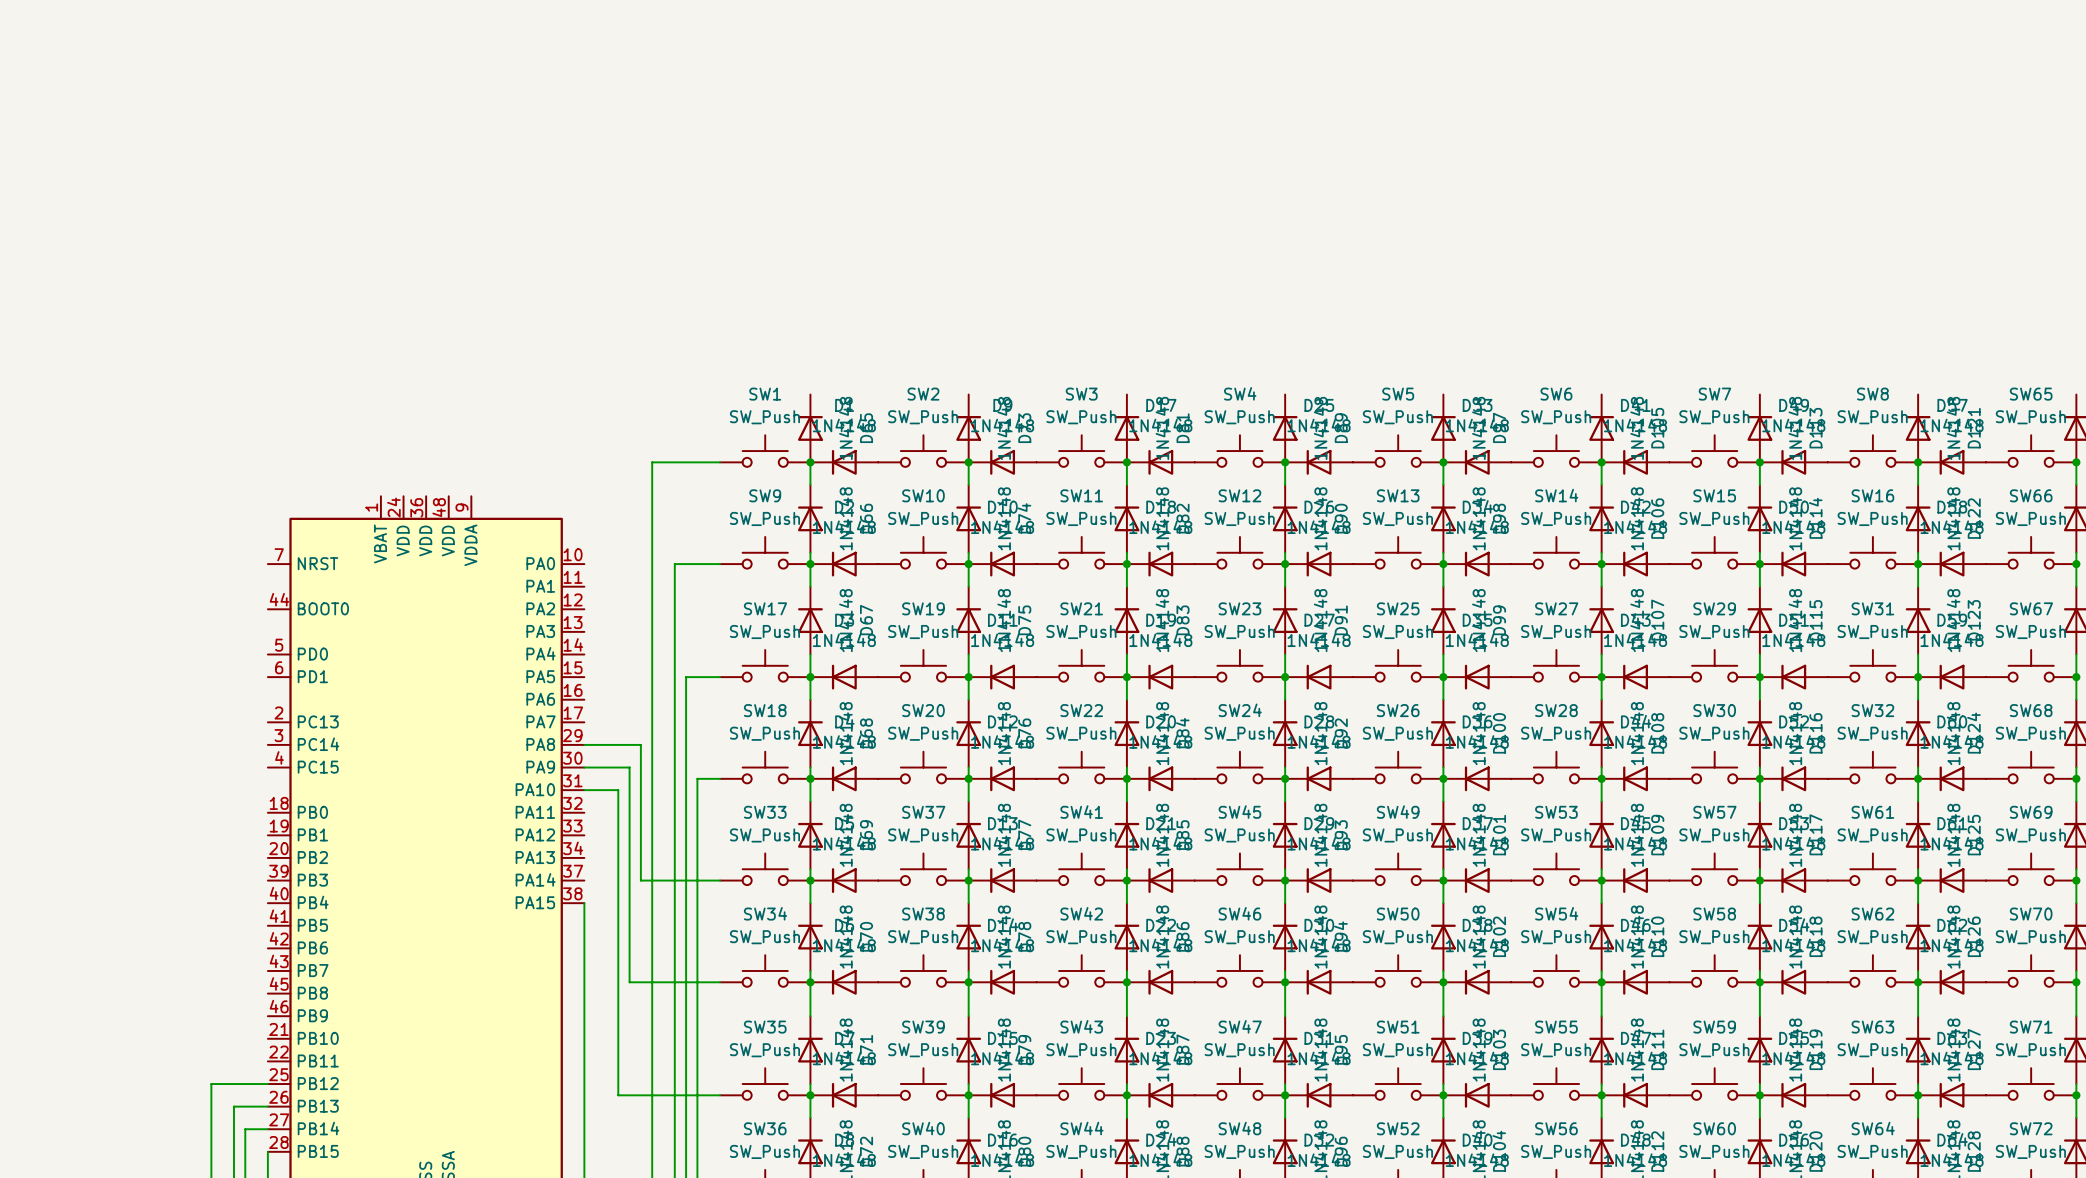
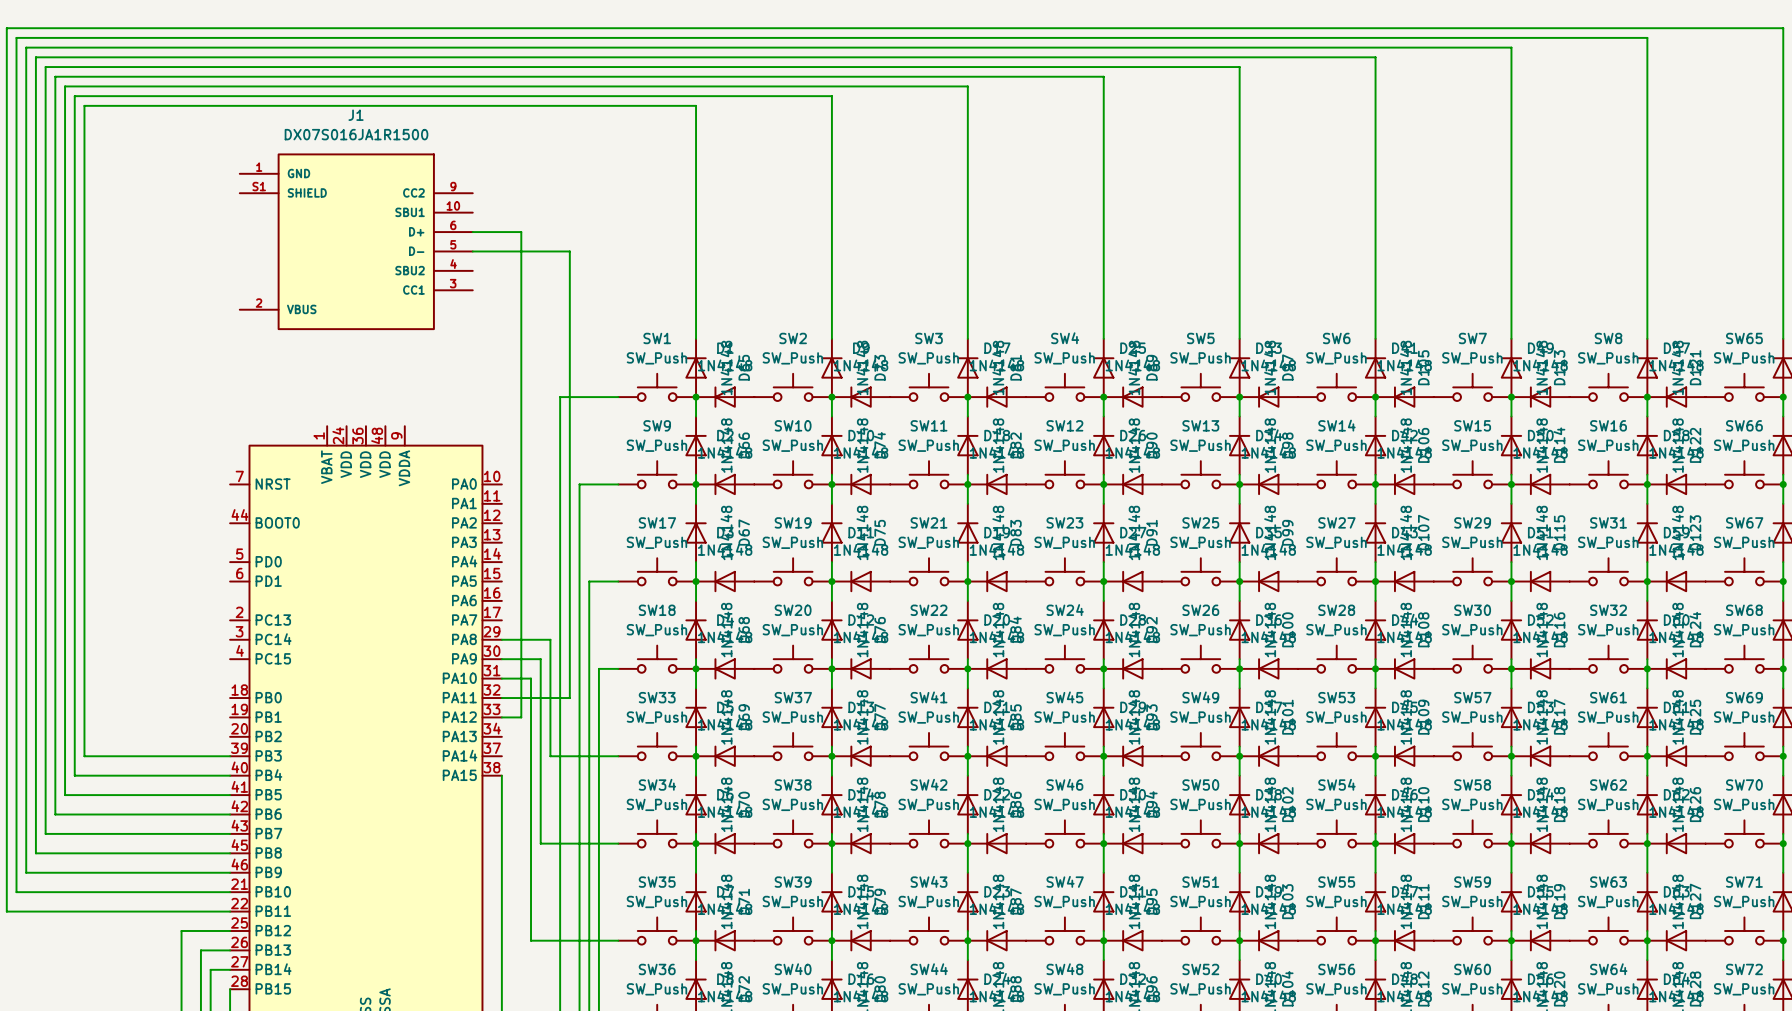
wire: none -> (472, 232) (521, 232) (521, 717) (501, 717)
J1: none -> DX07S016JA1R1500 (356, 241)
wire: none -> (472, 251) (569, 251) (569, 698) (501, 698)
wire: none -> (696, 338) (696, 105) (84, 105) (84, 756) (230, 756)
wire: none -> (831, 338) (831, 96) (74, 96) (74, 775) (230, 775)
wire: none -> (967, 338) (967, 86) (65, 86) (65, 795) (230, 795)
wire: none -> (1103, 338) (1103, 76) (55, 76) (55, 814) (230, 814)
wire: none -> (1239, 338) (1239, 67) (45, 67) (45, 833) (230, 833)
wire: none -> (1375, 338) (1375, 57) (35, 57) (35, 853) (230, 853)
wire: none -> (1511, 338) (1511, 47) (26, 47) (26, 872) (230, 872)
wire: none -> (1647, 338) (1647, 37) (16, 37) (16, 892) (230, 892)
wire: none -> (1783, 338) (1783, 28) (6, 28) (6, 911) (230, 911)

